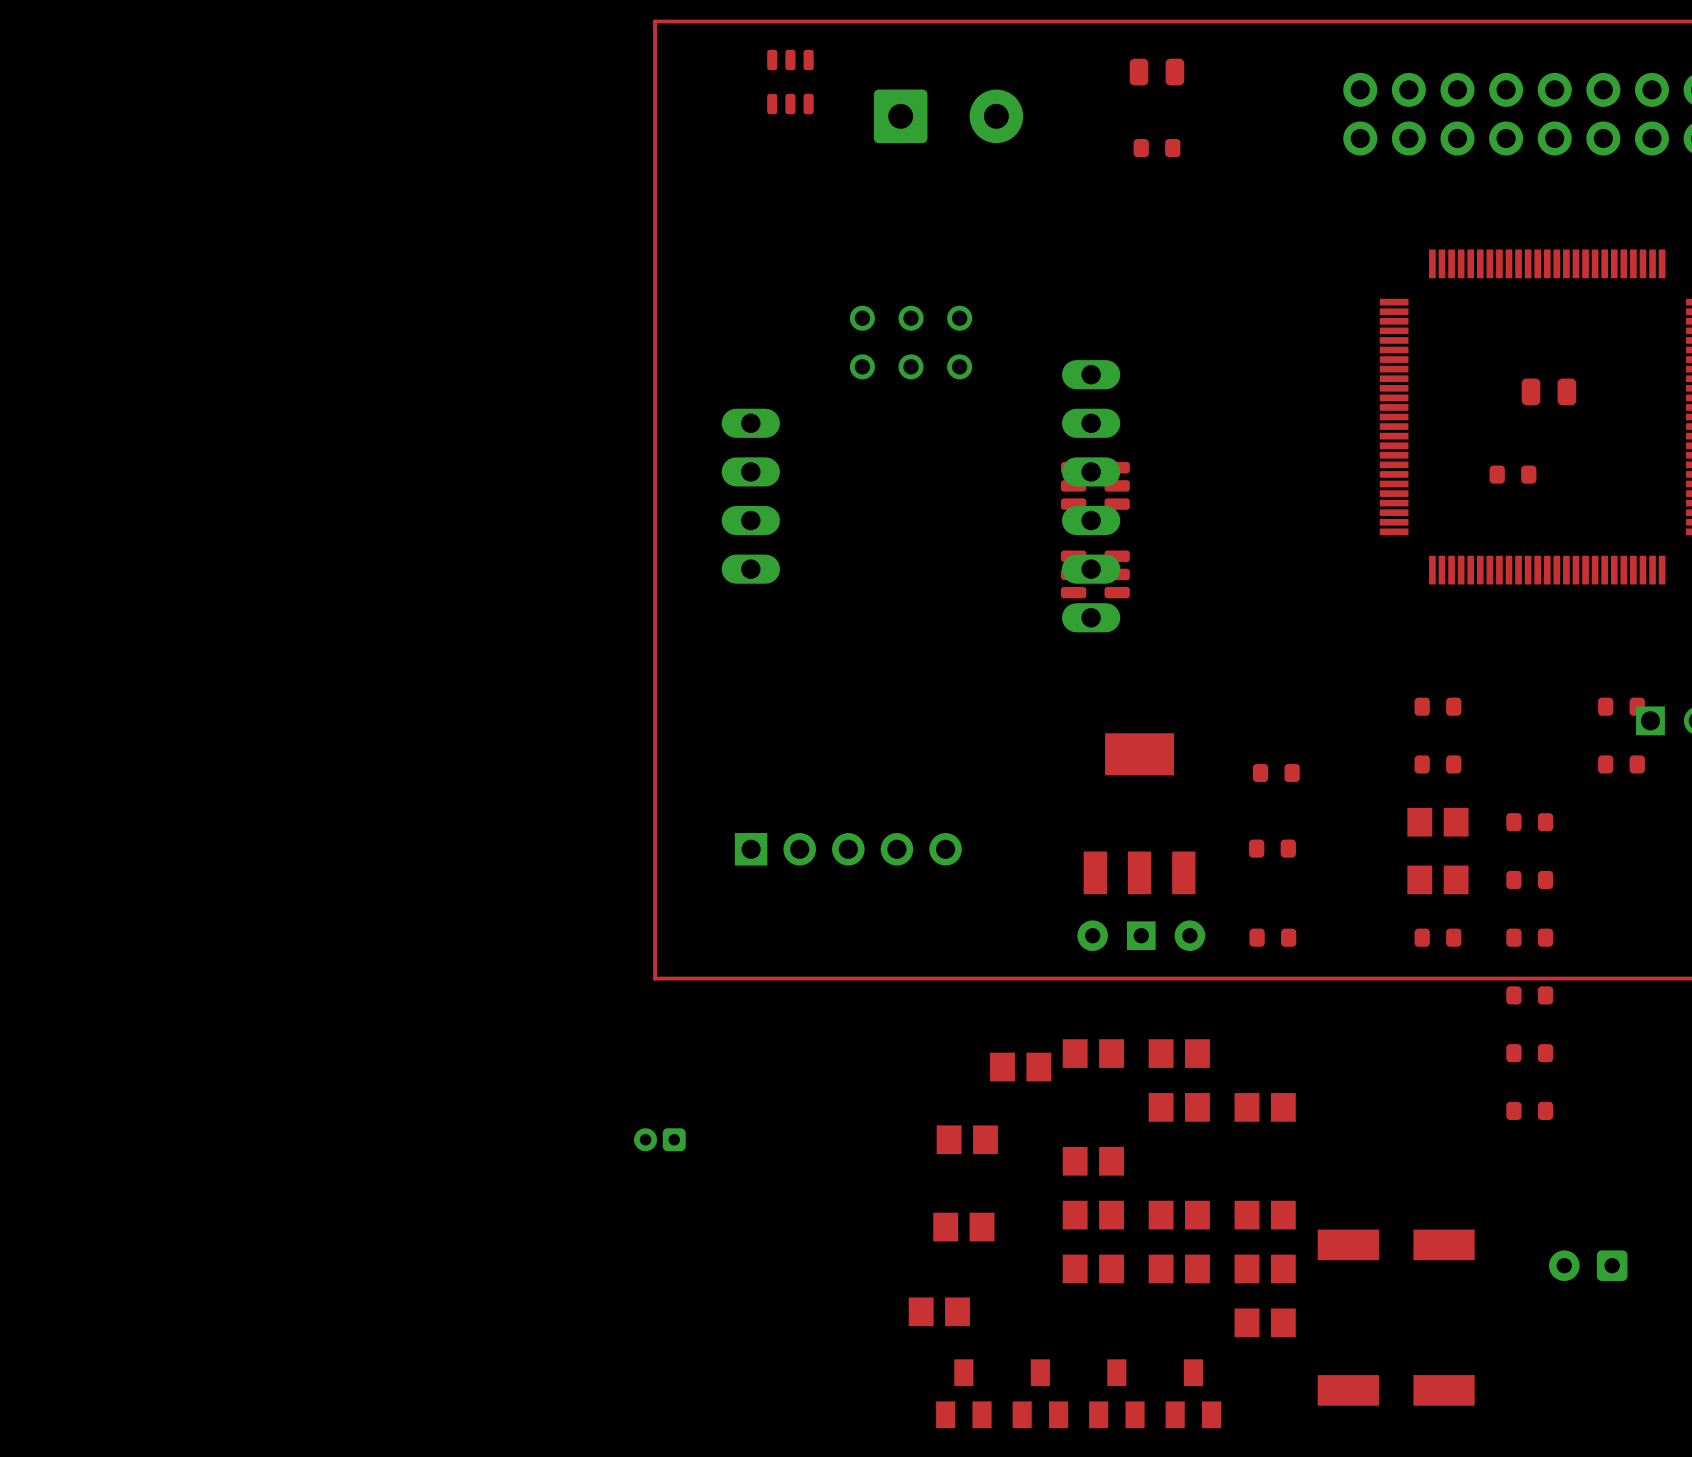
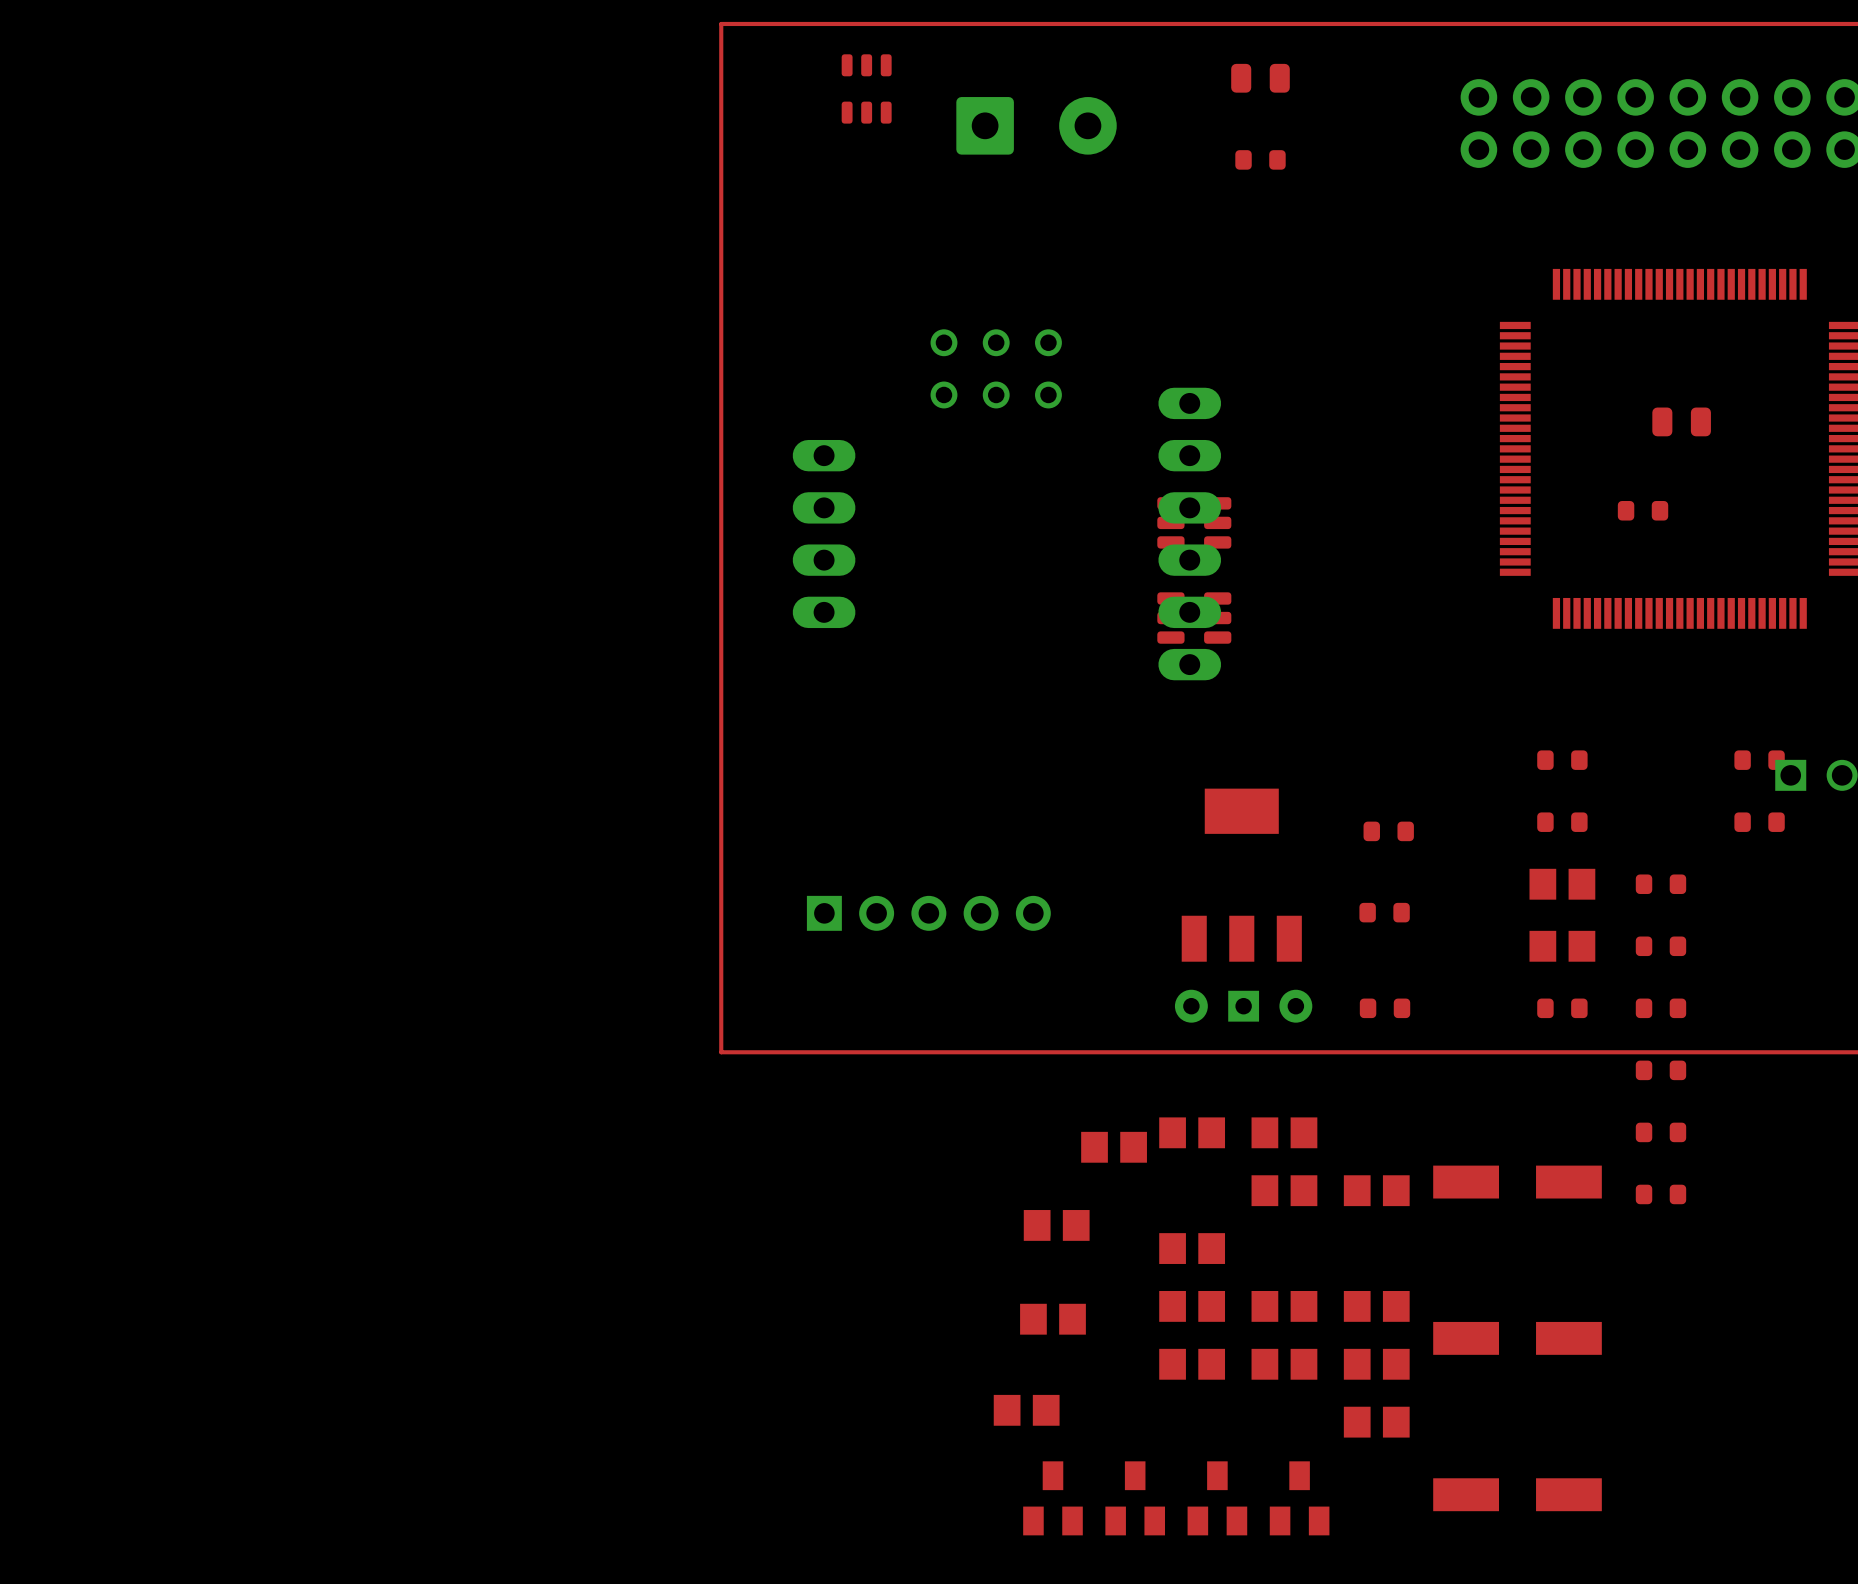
part: none -> (1517, 1182)
part: (659, 1139) -> none
part: (1588, 1265) -> none

